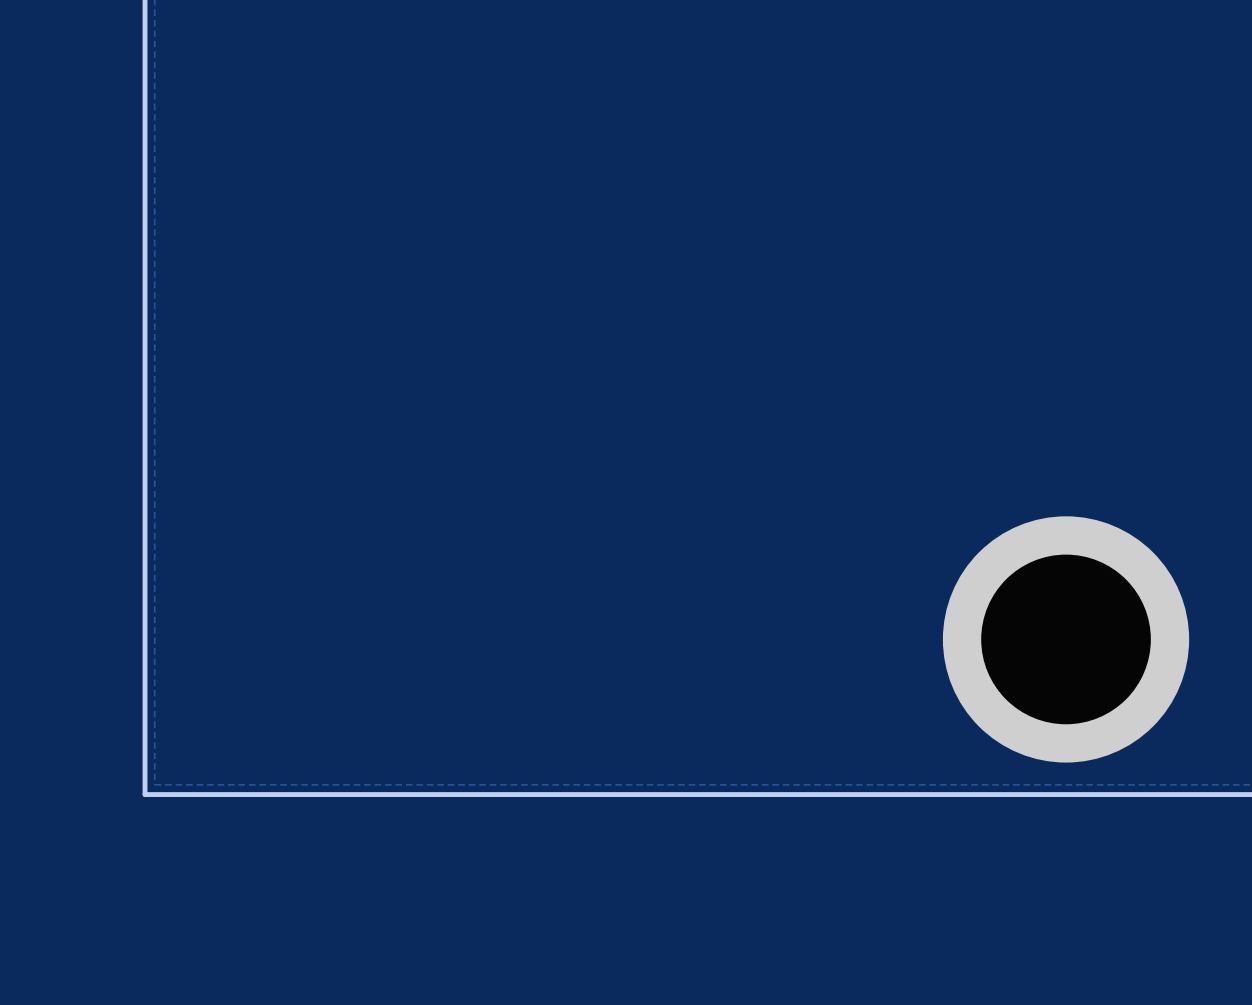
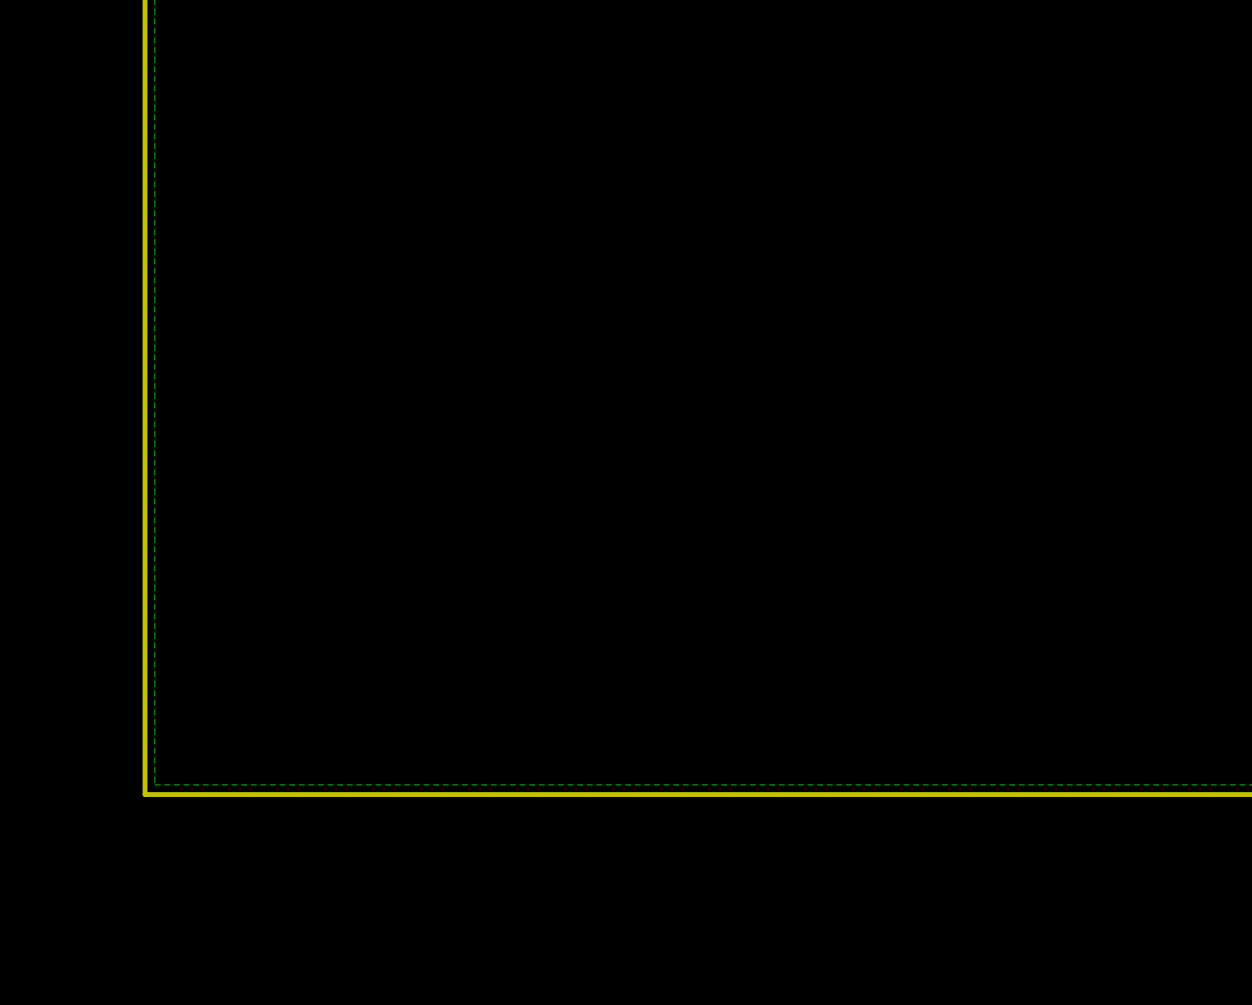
part: (1066, 639) -> none

